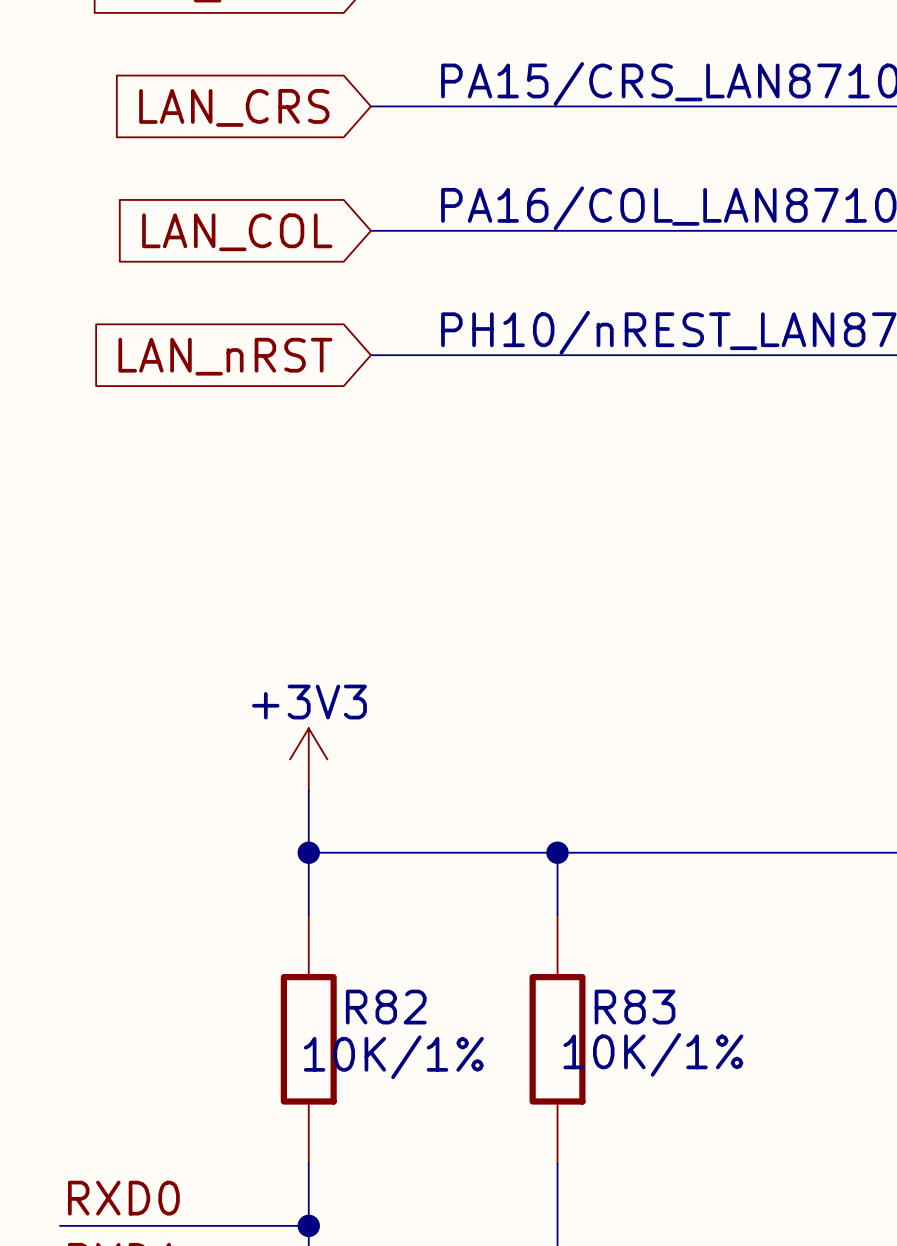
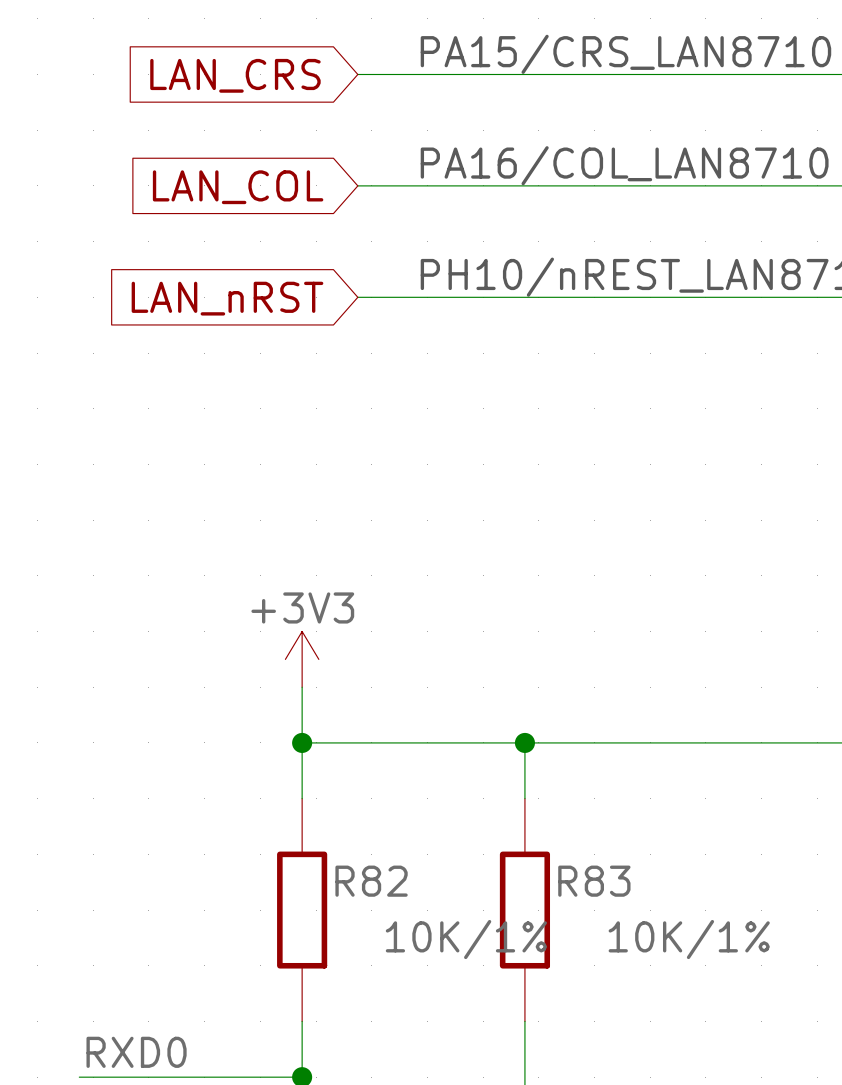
R83 value position: 10K/1% (653, 1054) -> 10K/1% (689, 939)
R82 value position: 10K/1% (393, 1057) -> 10K/1% (466, 939)

